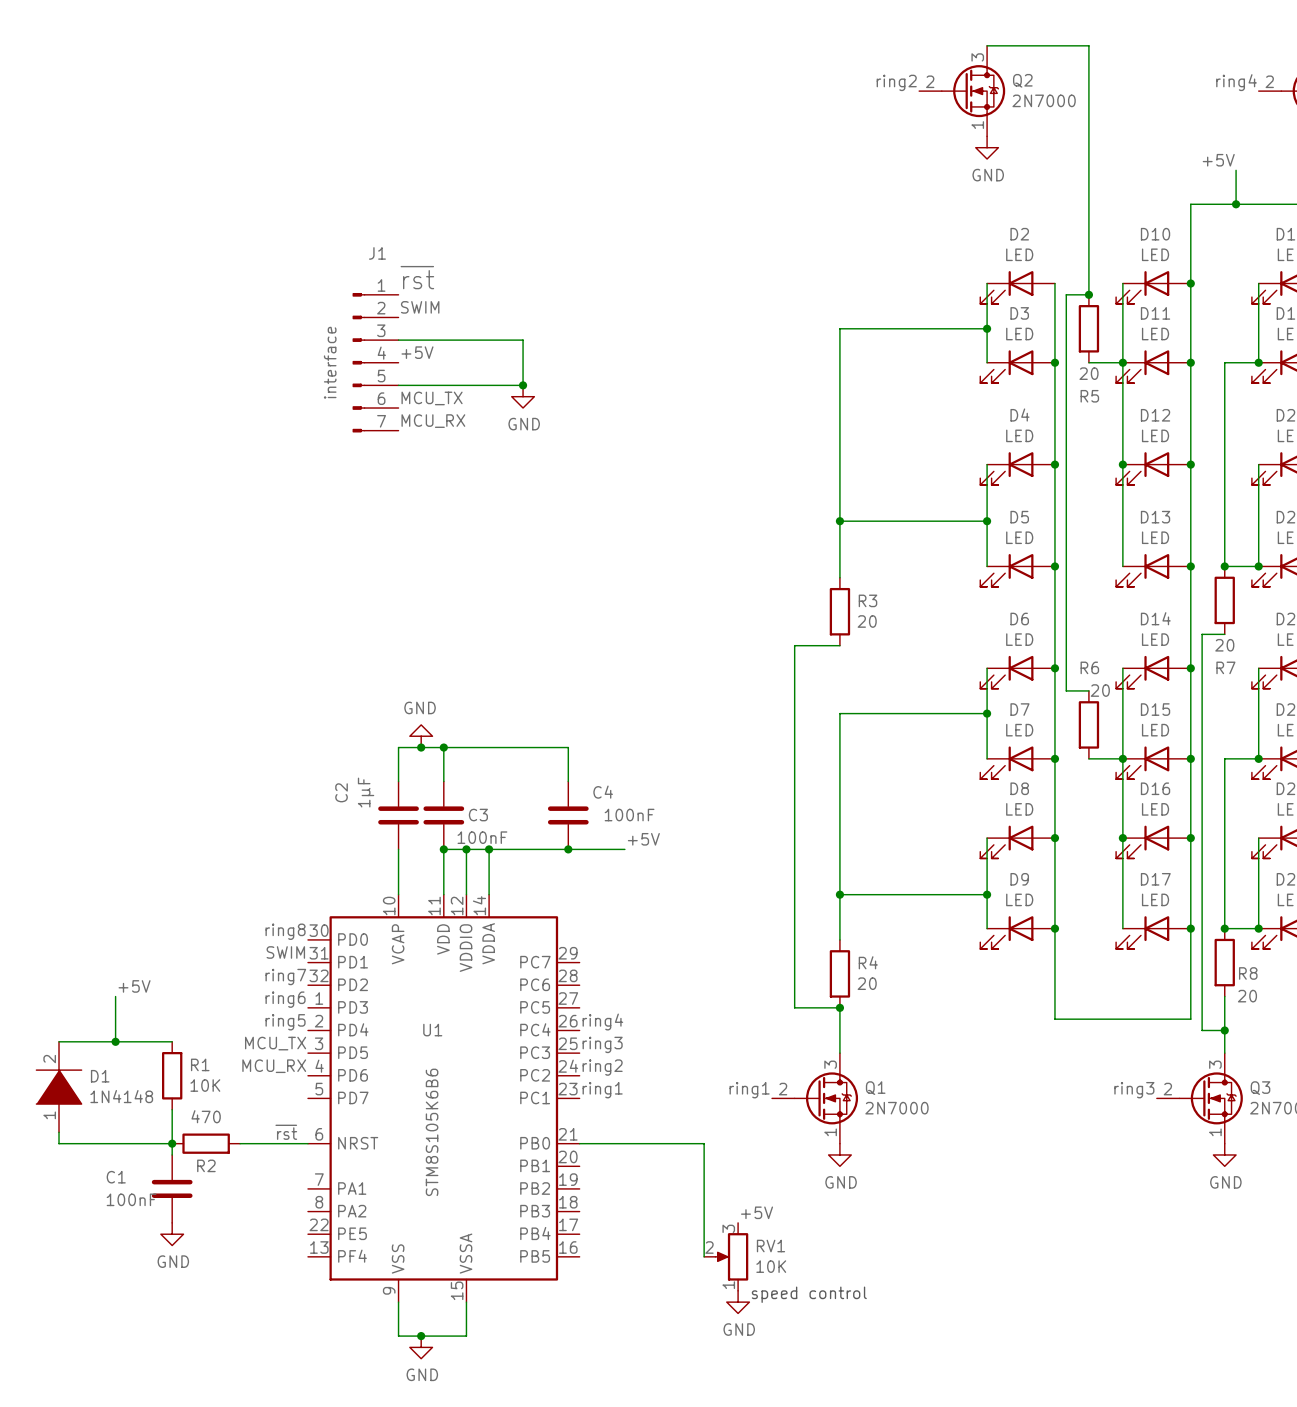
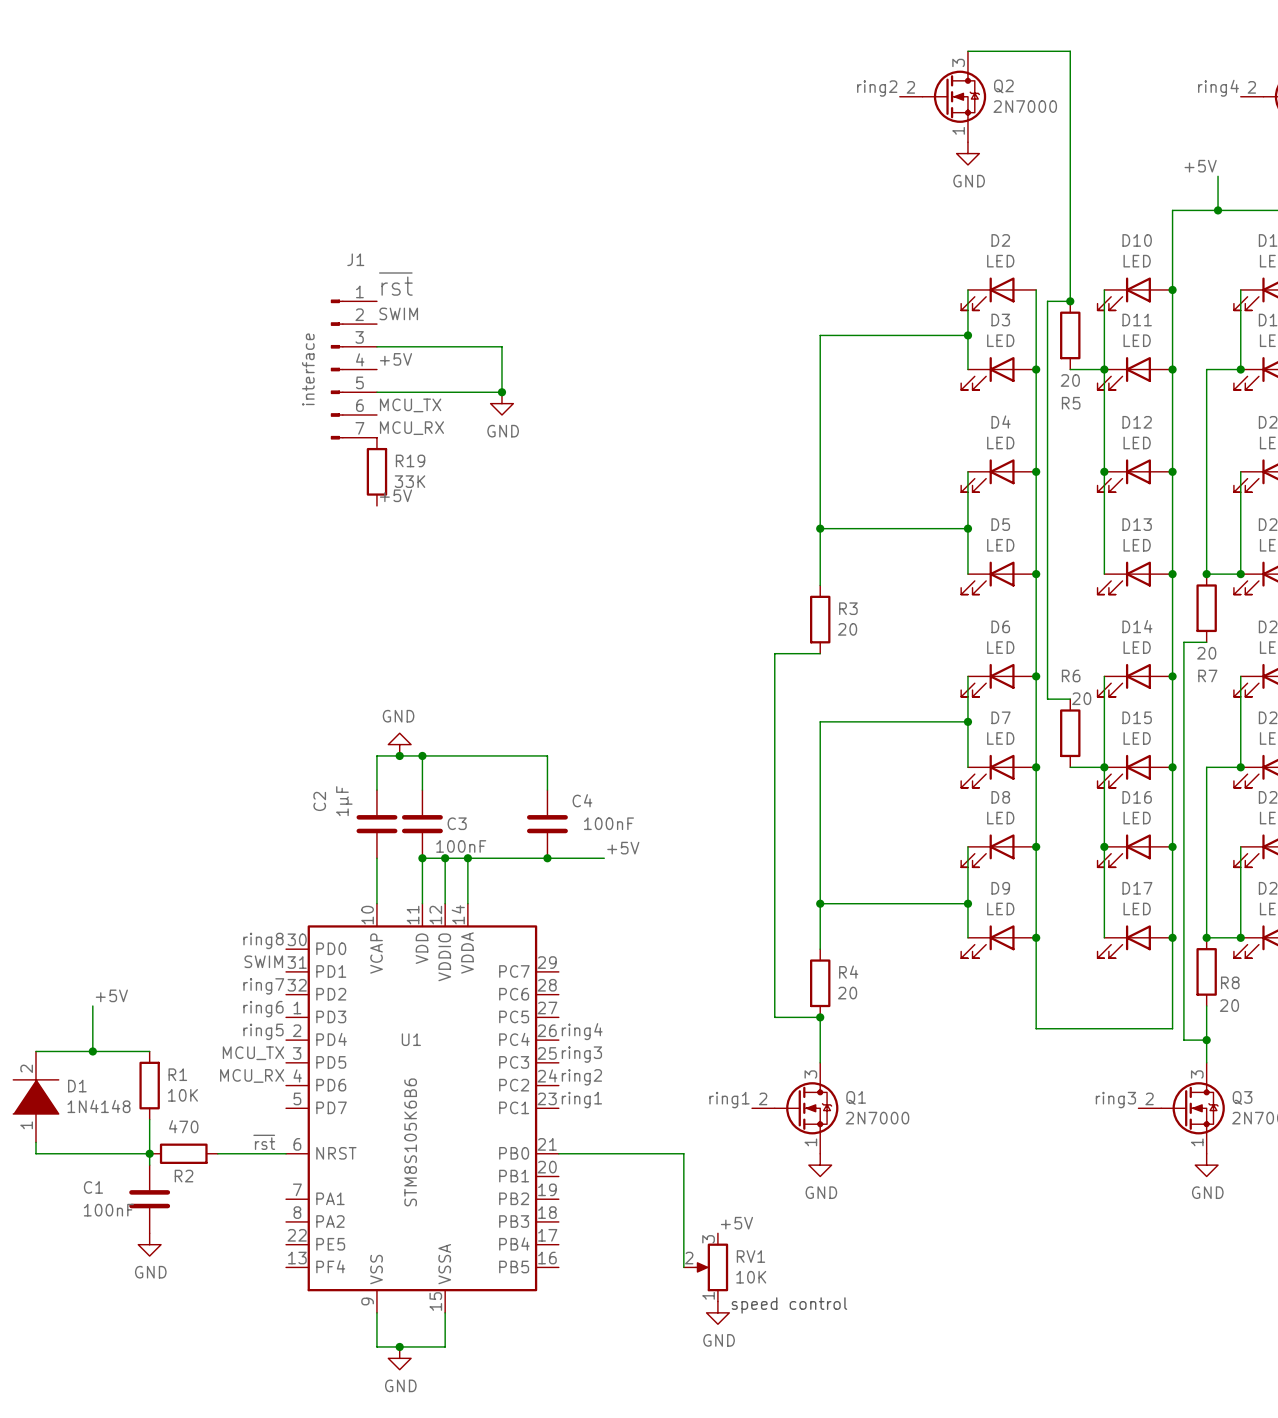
R19: none -> 33K (376, 471)
label: none -> +5V (395, 495)

